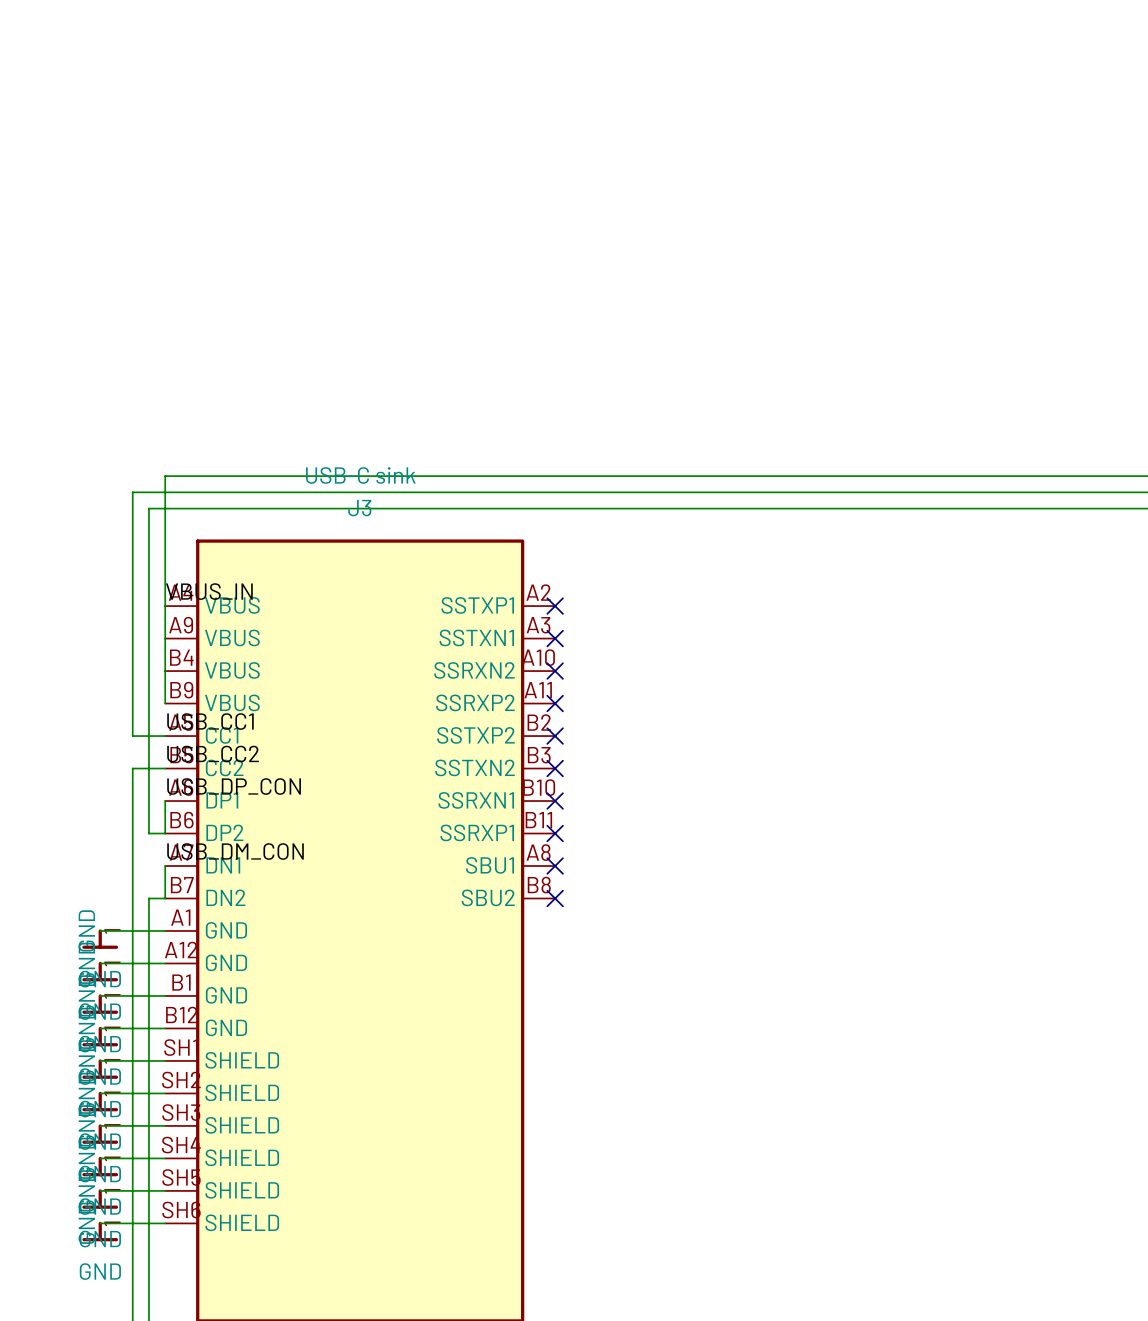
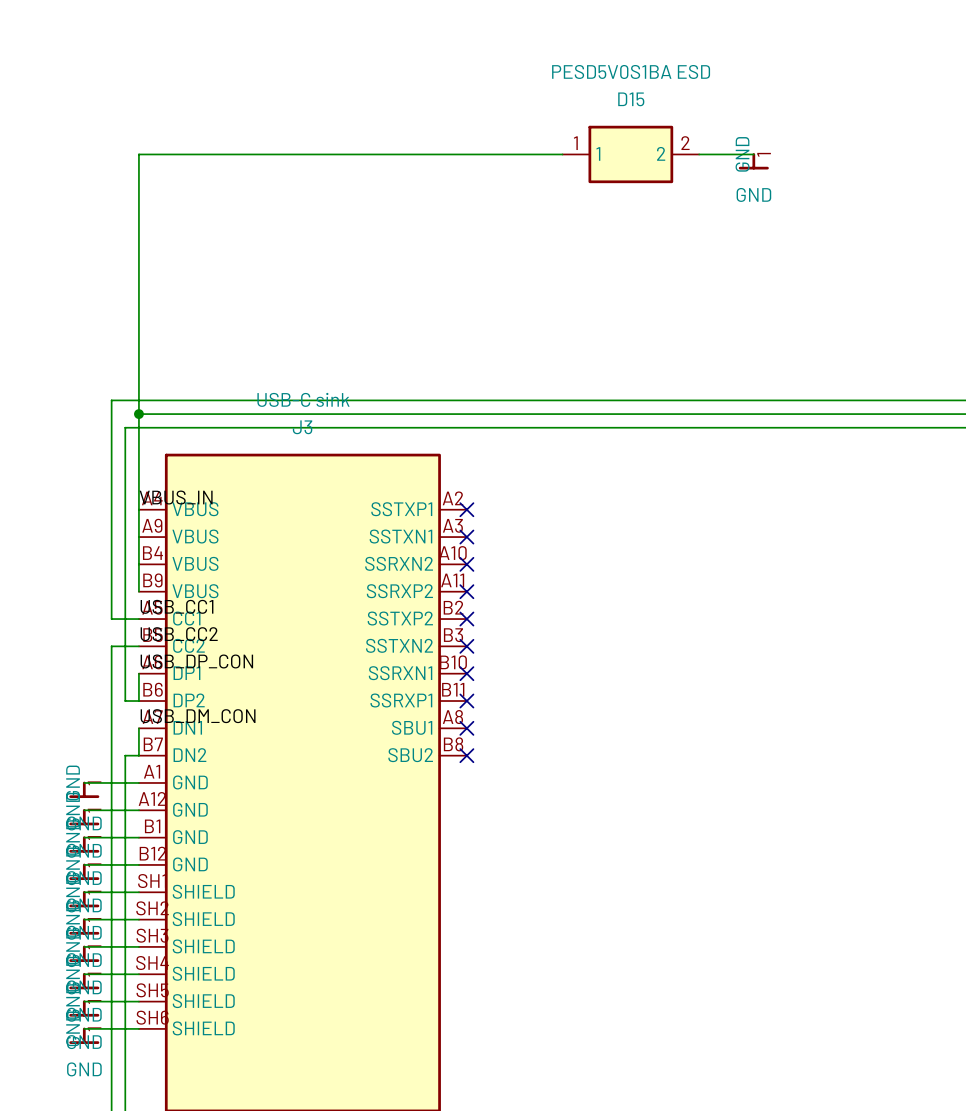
D15: none -> PESD5V0S1BA ESD (630, 154)
wire: none -> (699, 154) (753, 154)
power symbol: none -> GND (753, 161)
wire: (132, 492) (165, 492) -> (111, 414) (111, 400) (138, 400) (138, 154) (562, 154)
junction: none -> (138, 414)

